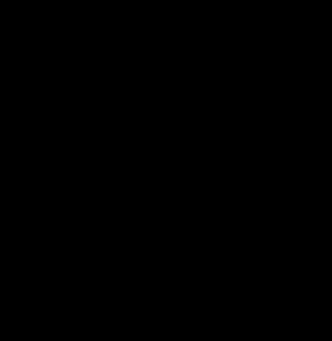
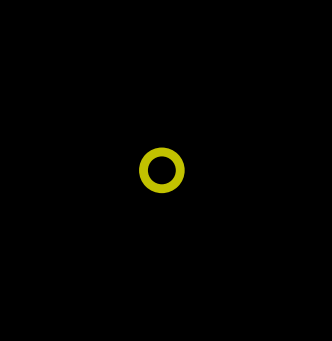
part: none -> (161, 170)

